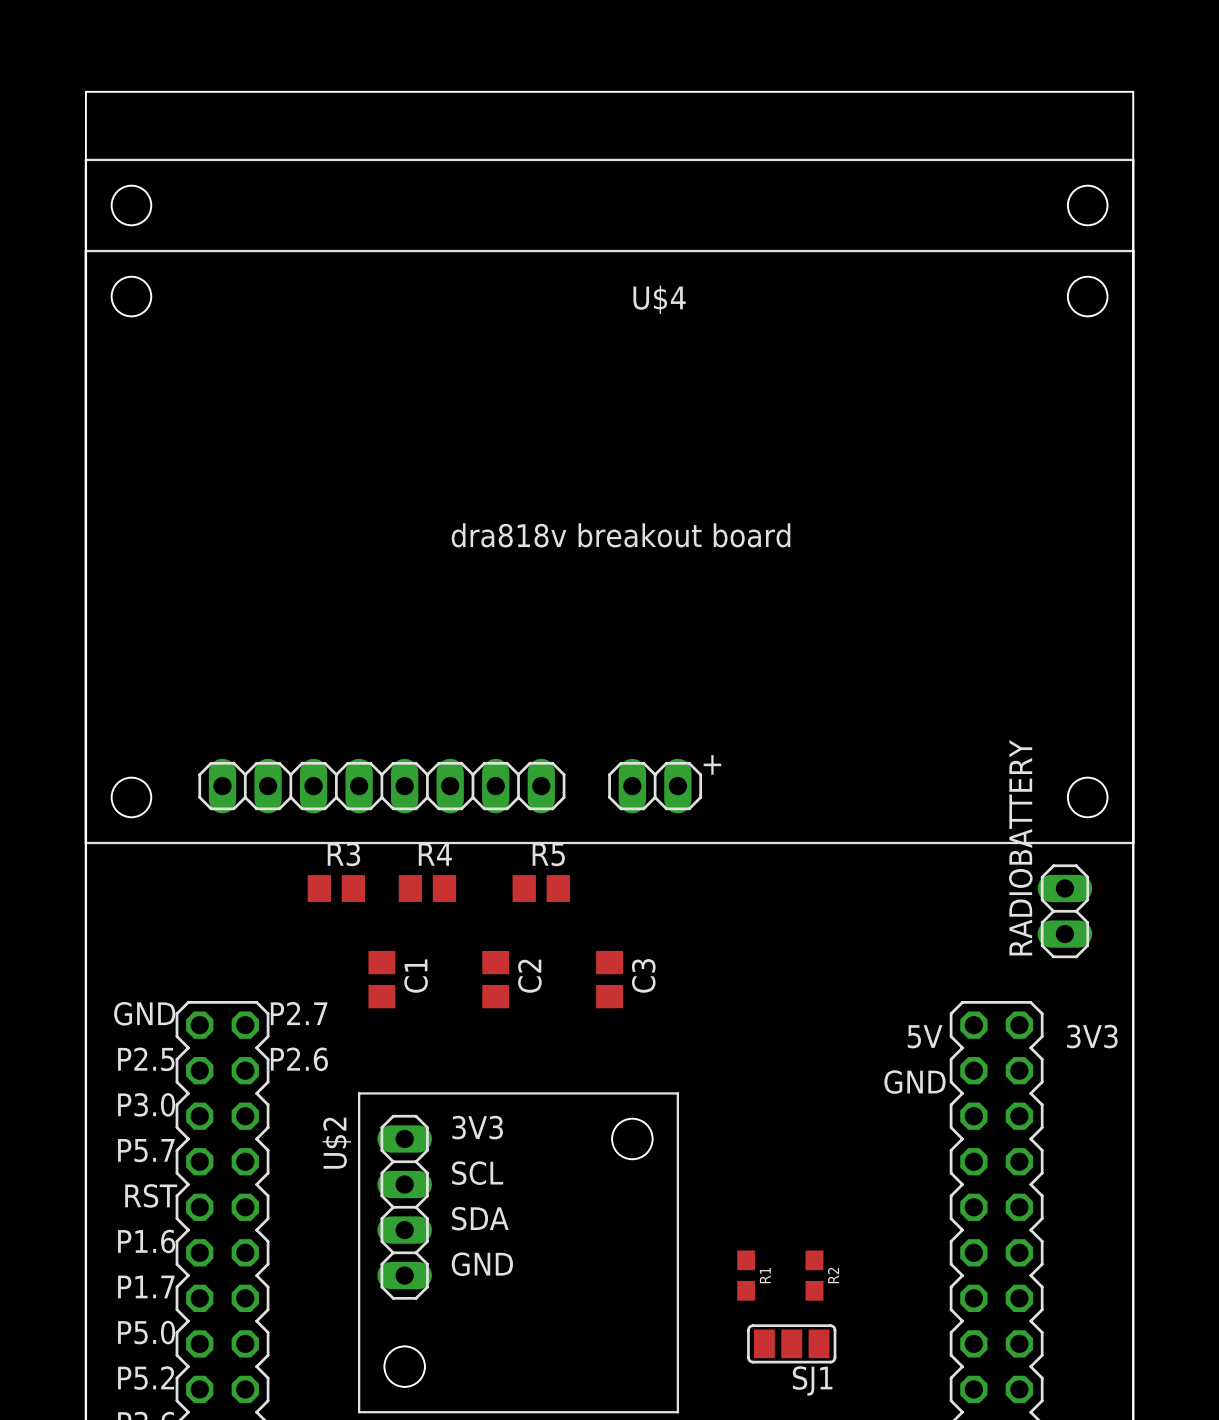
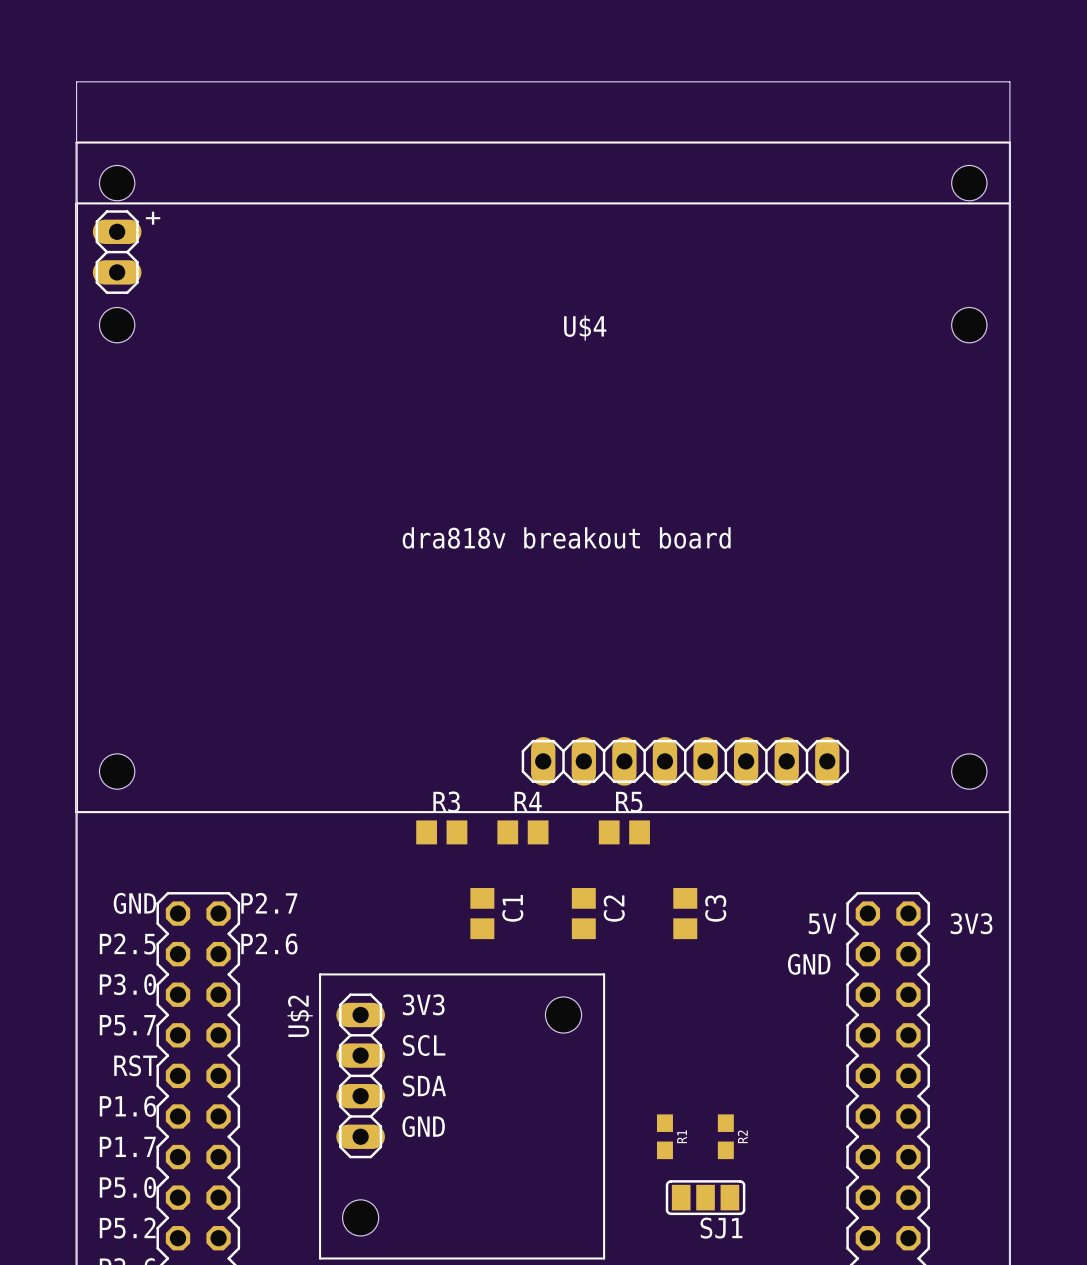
U$4 footprint: [84, 249, 1135, 845] -> [75, 202, 1011, 814]
U$4 name position: U$4 (659, 299) -> U$4 (585, 327)
R3 position: (336, 888) -> (441, 832)
R4 position: (427, 888) -> (522, 832)
R5 position: (541, 888) -> (624, 832)
RADIOBATTERY: (1064, 911) -> none
C1 position: (381, 979) -> (482, 913)
C2 position: (495, 979) -> (583, 913)
C3 position: (609, 979) -> (685, 913)

